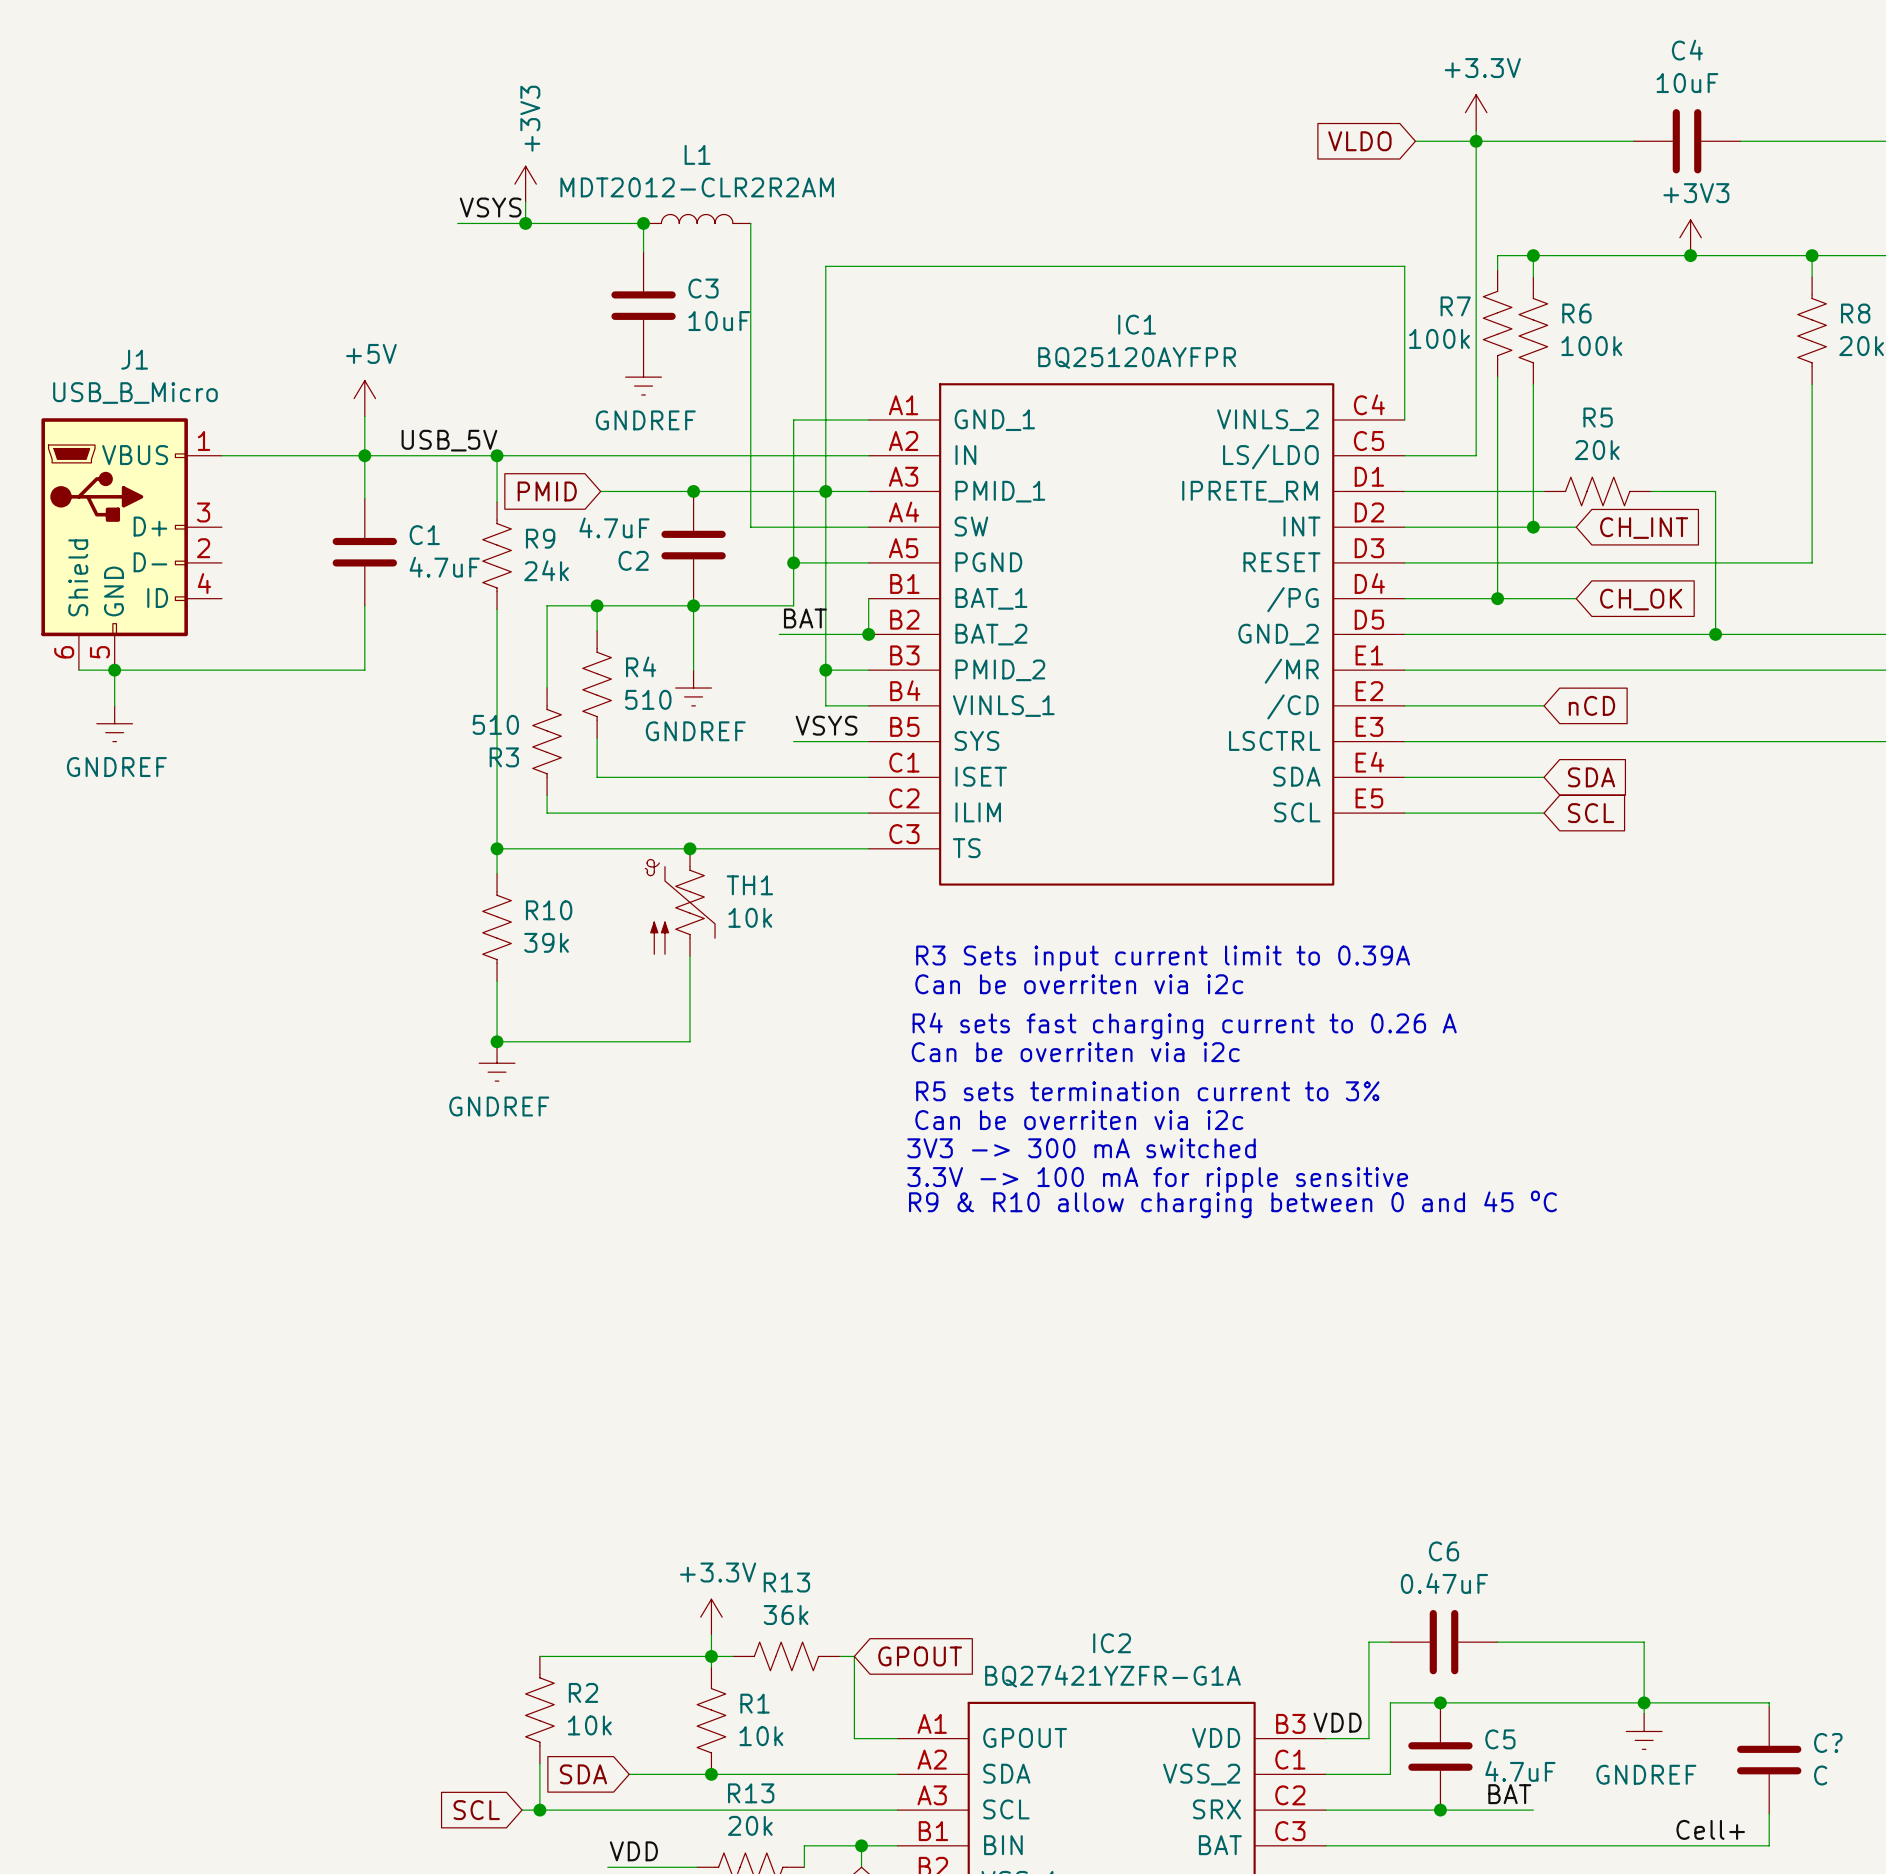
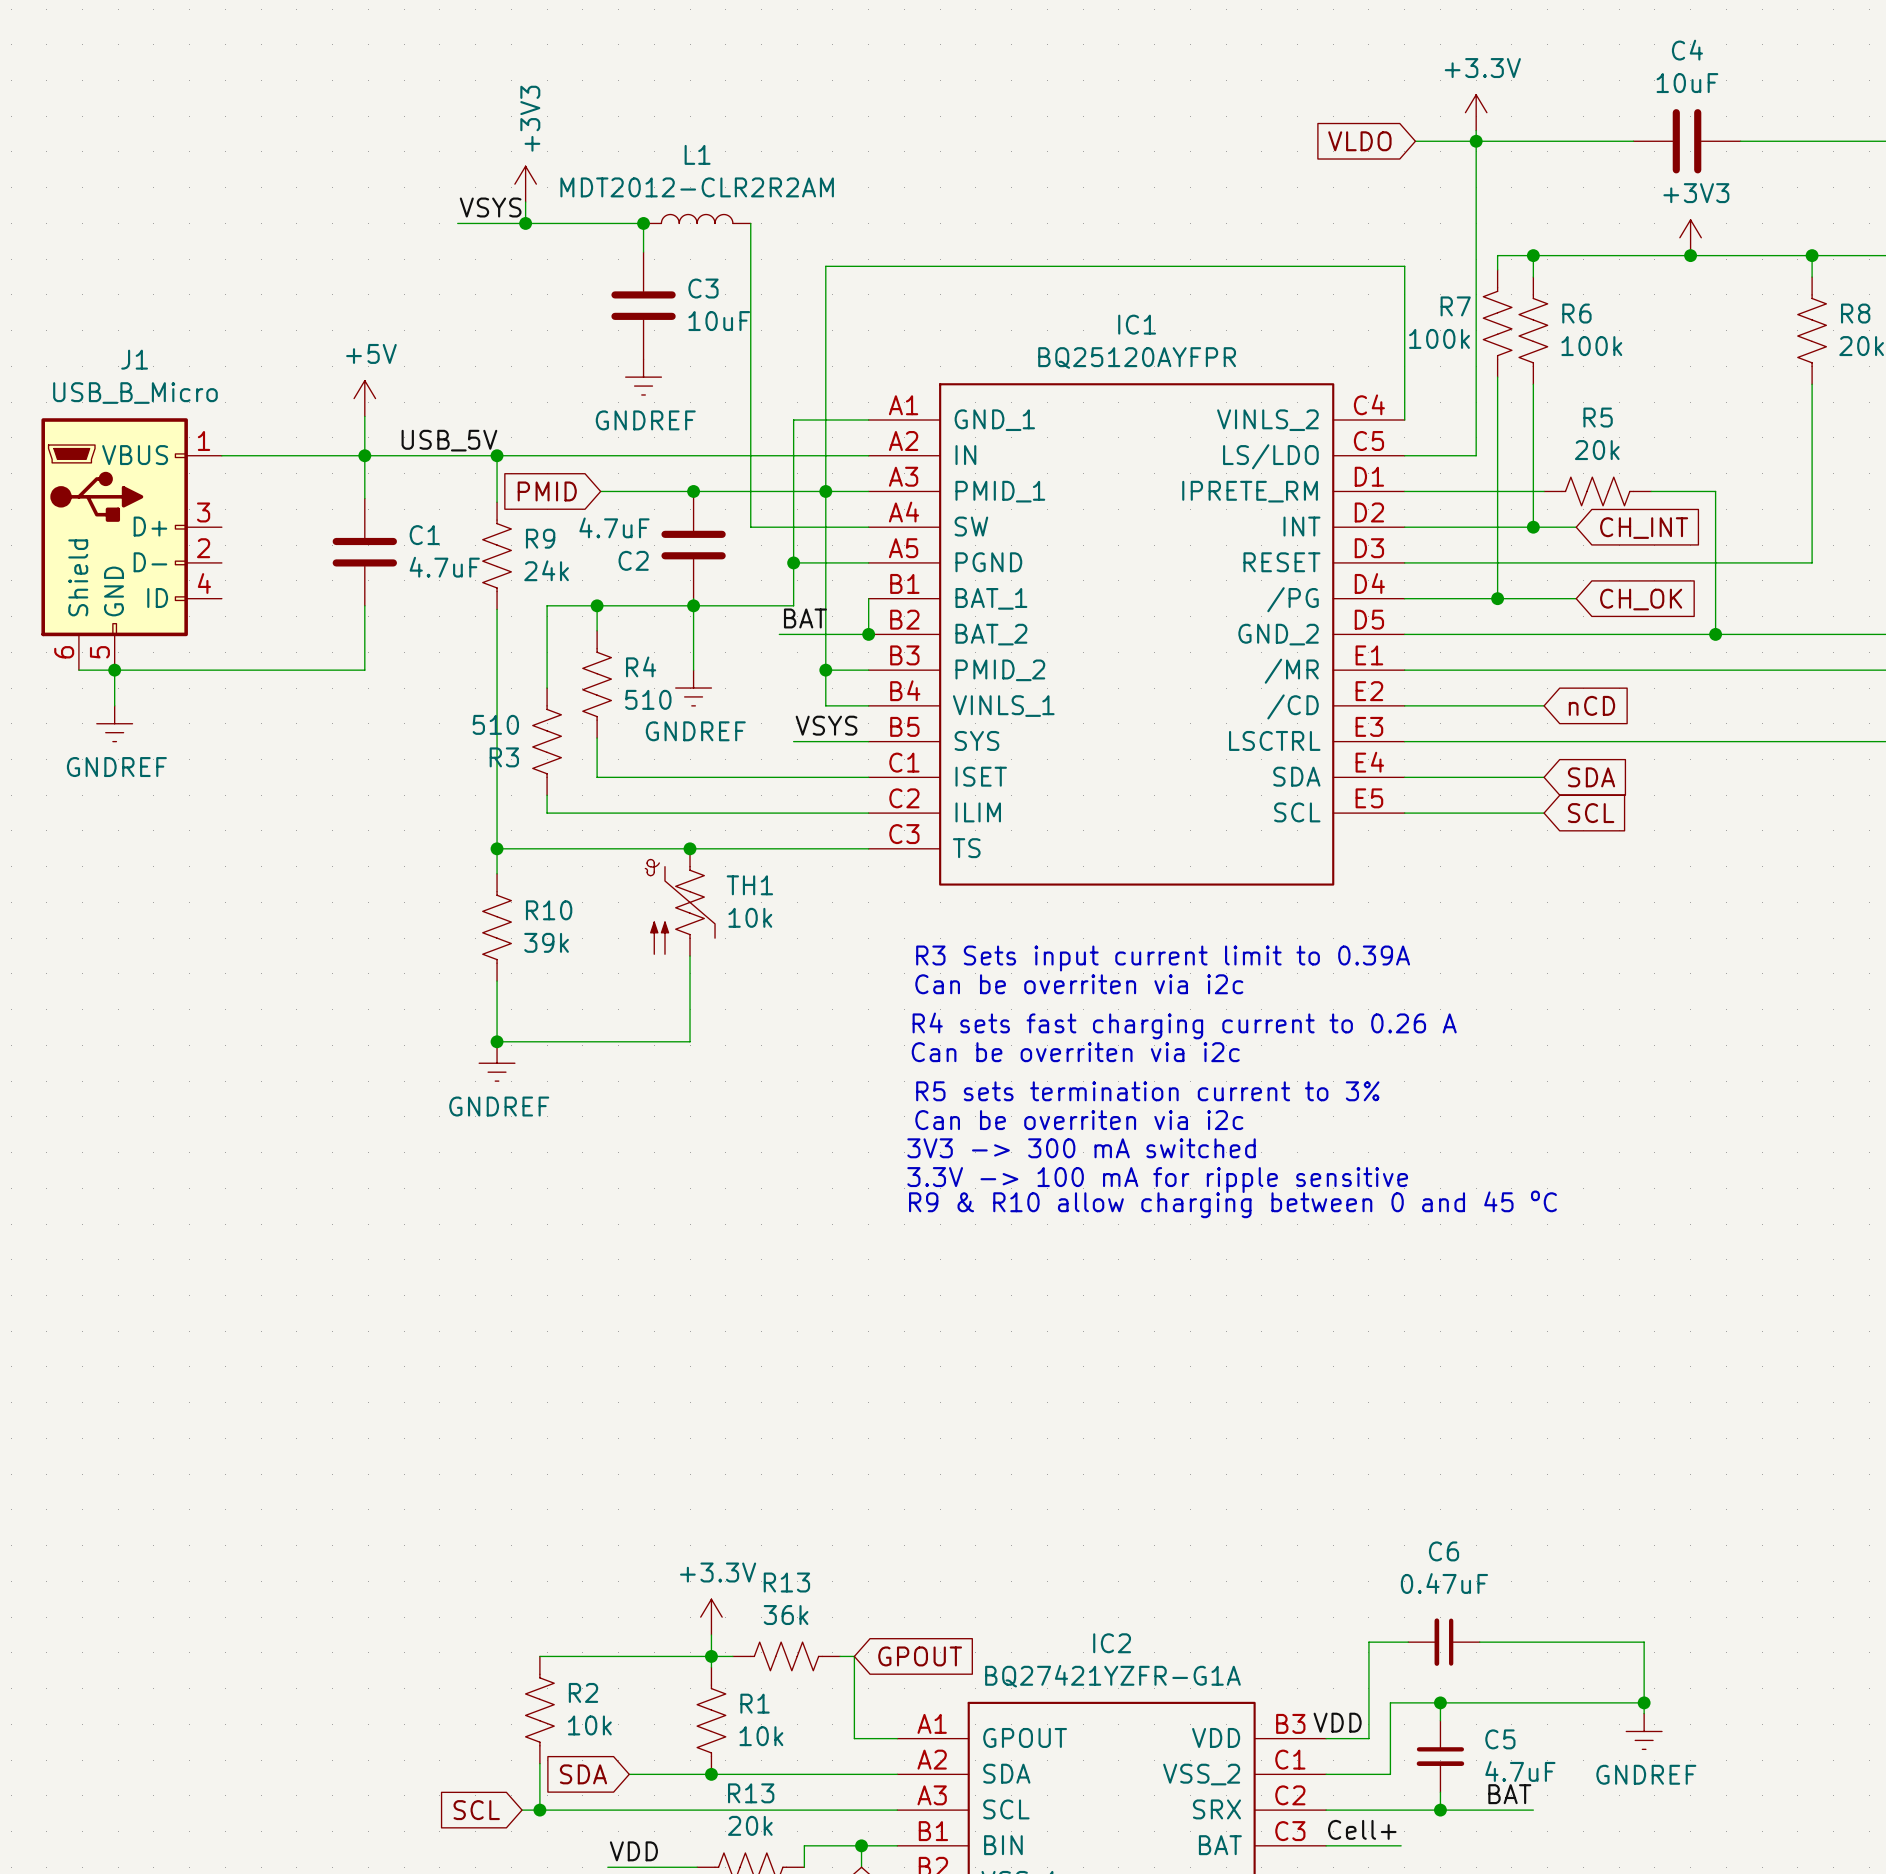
C6 symbol: [1390, 1609, 1498, 1675] -> [1408, 1618, 1480, 1666]
C5 symbol: [1408, 1702, 1473, 1811] -> [1416, 1720, 1465, 1793]
wire: (1644, 1702) (1769, 1702) (1769, 1706) -> none
C?: C (1769, 1760) -> none
wire: (1769, 1813) (1769, 1845) (1401, 1845) -> none
label position: Cell+ (1710, 1829) -> Cell+ (1362, 1829)

